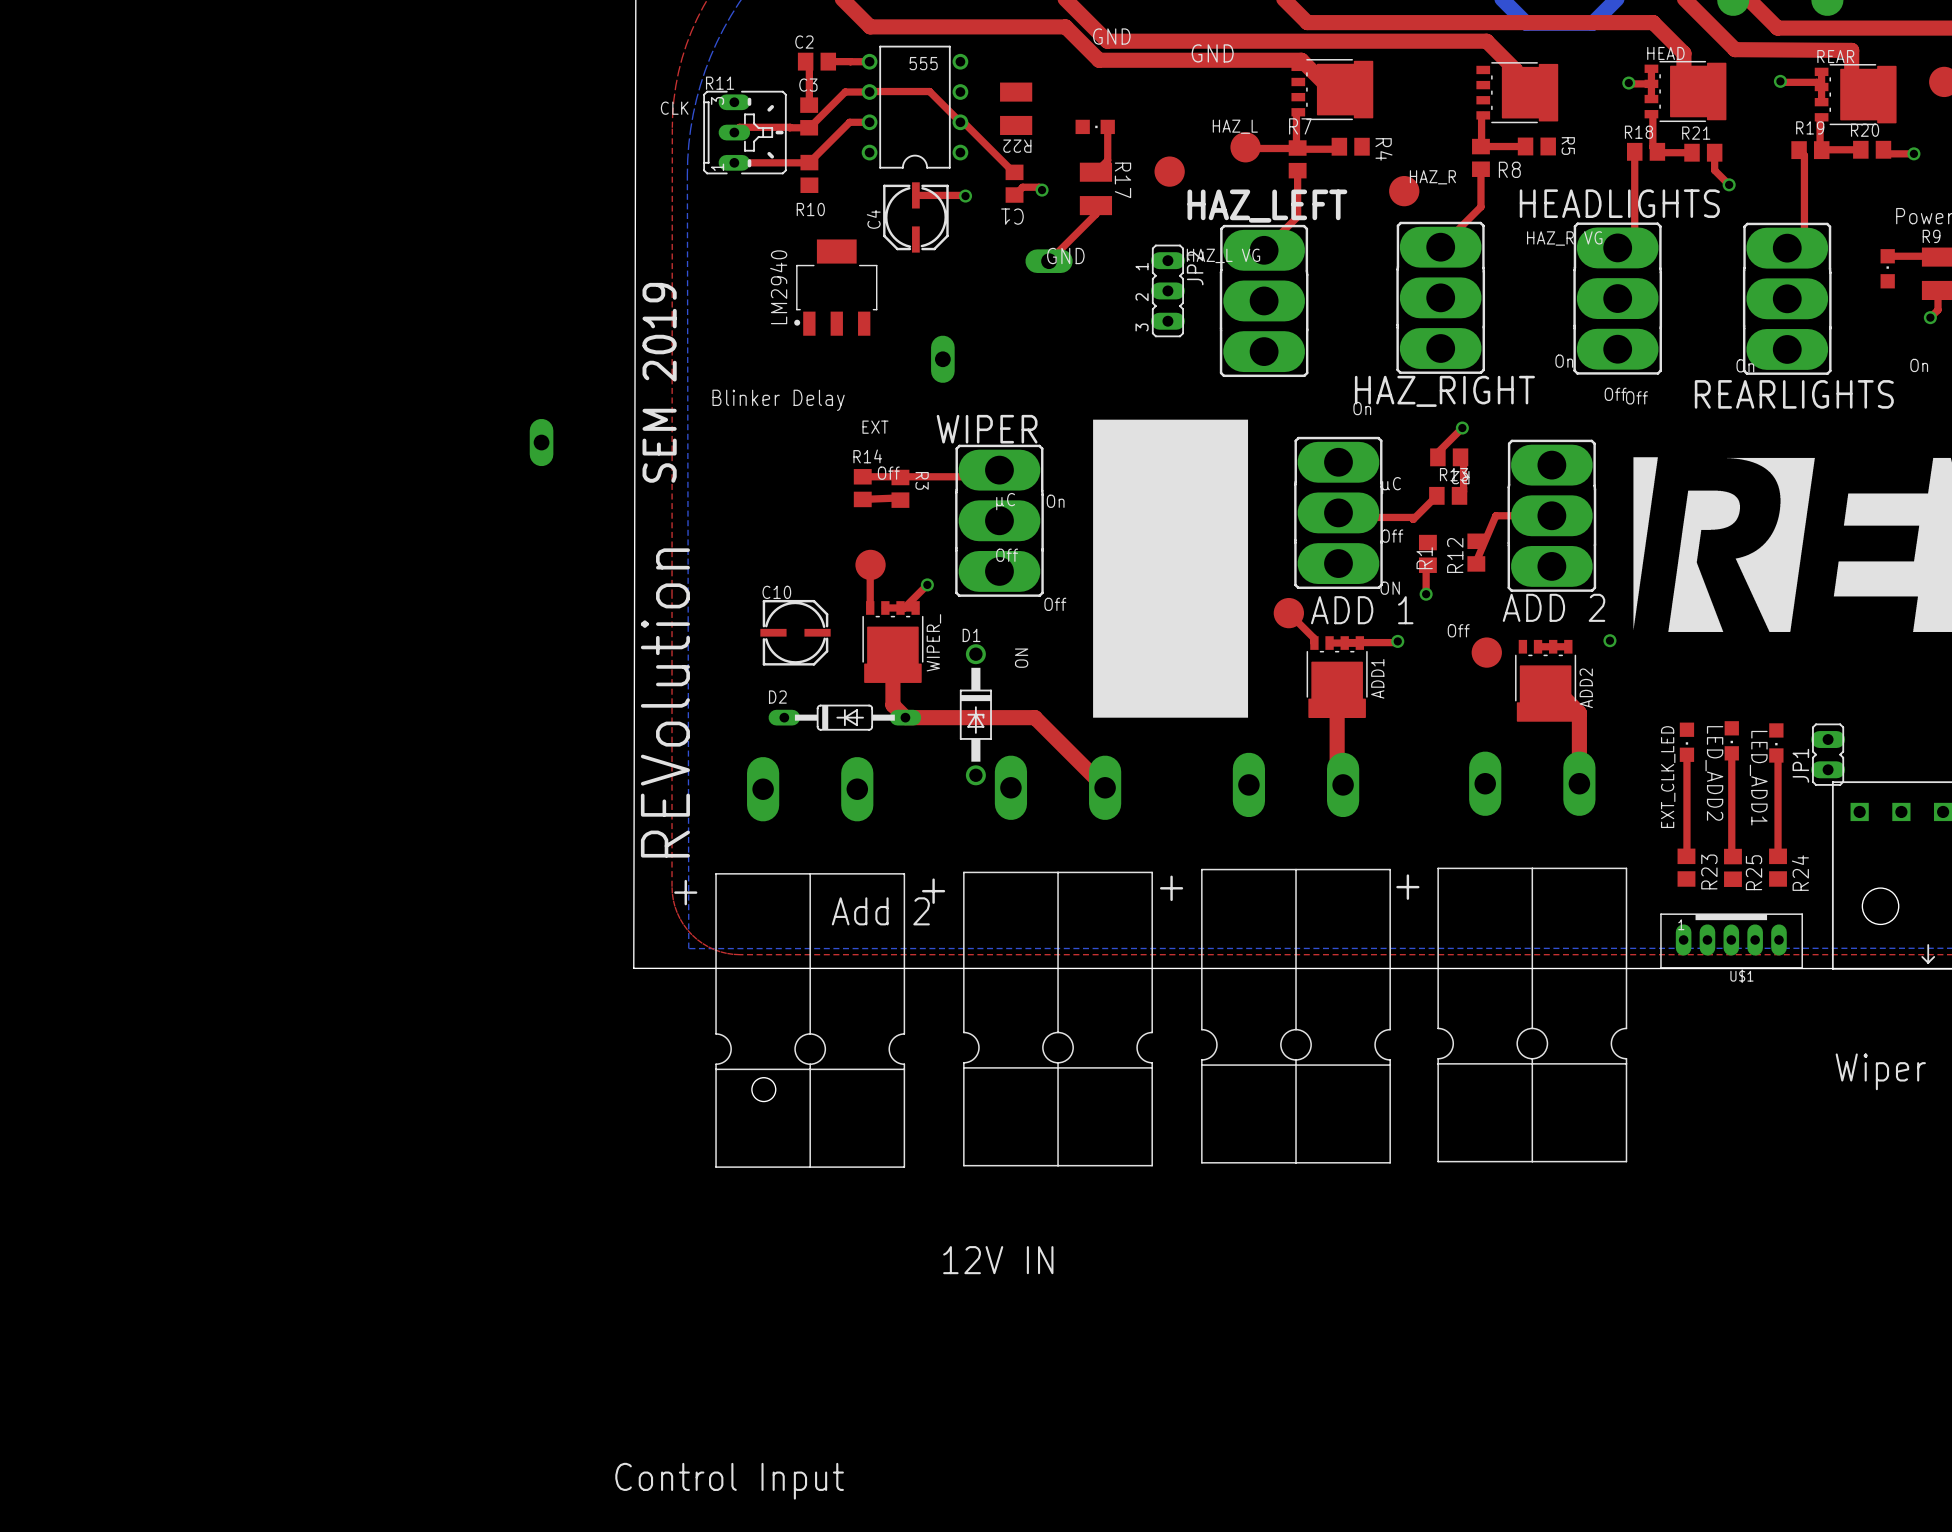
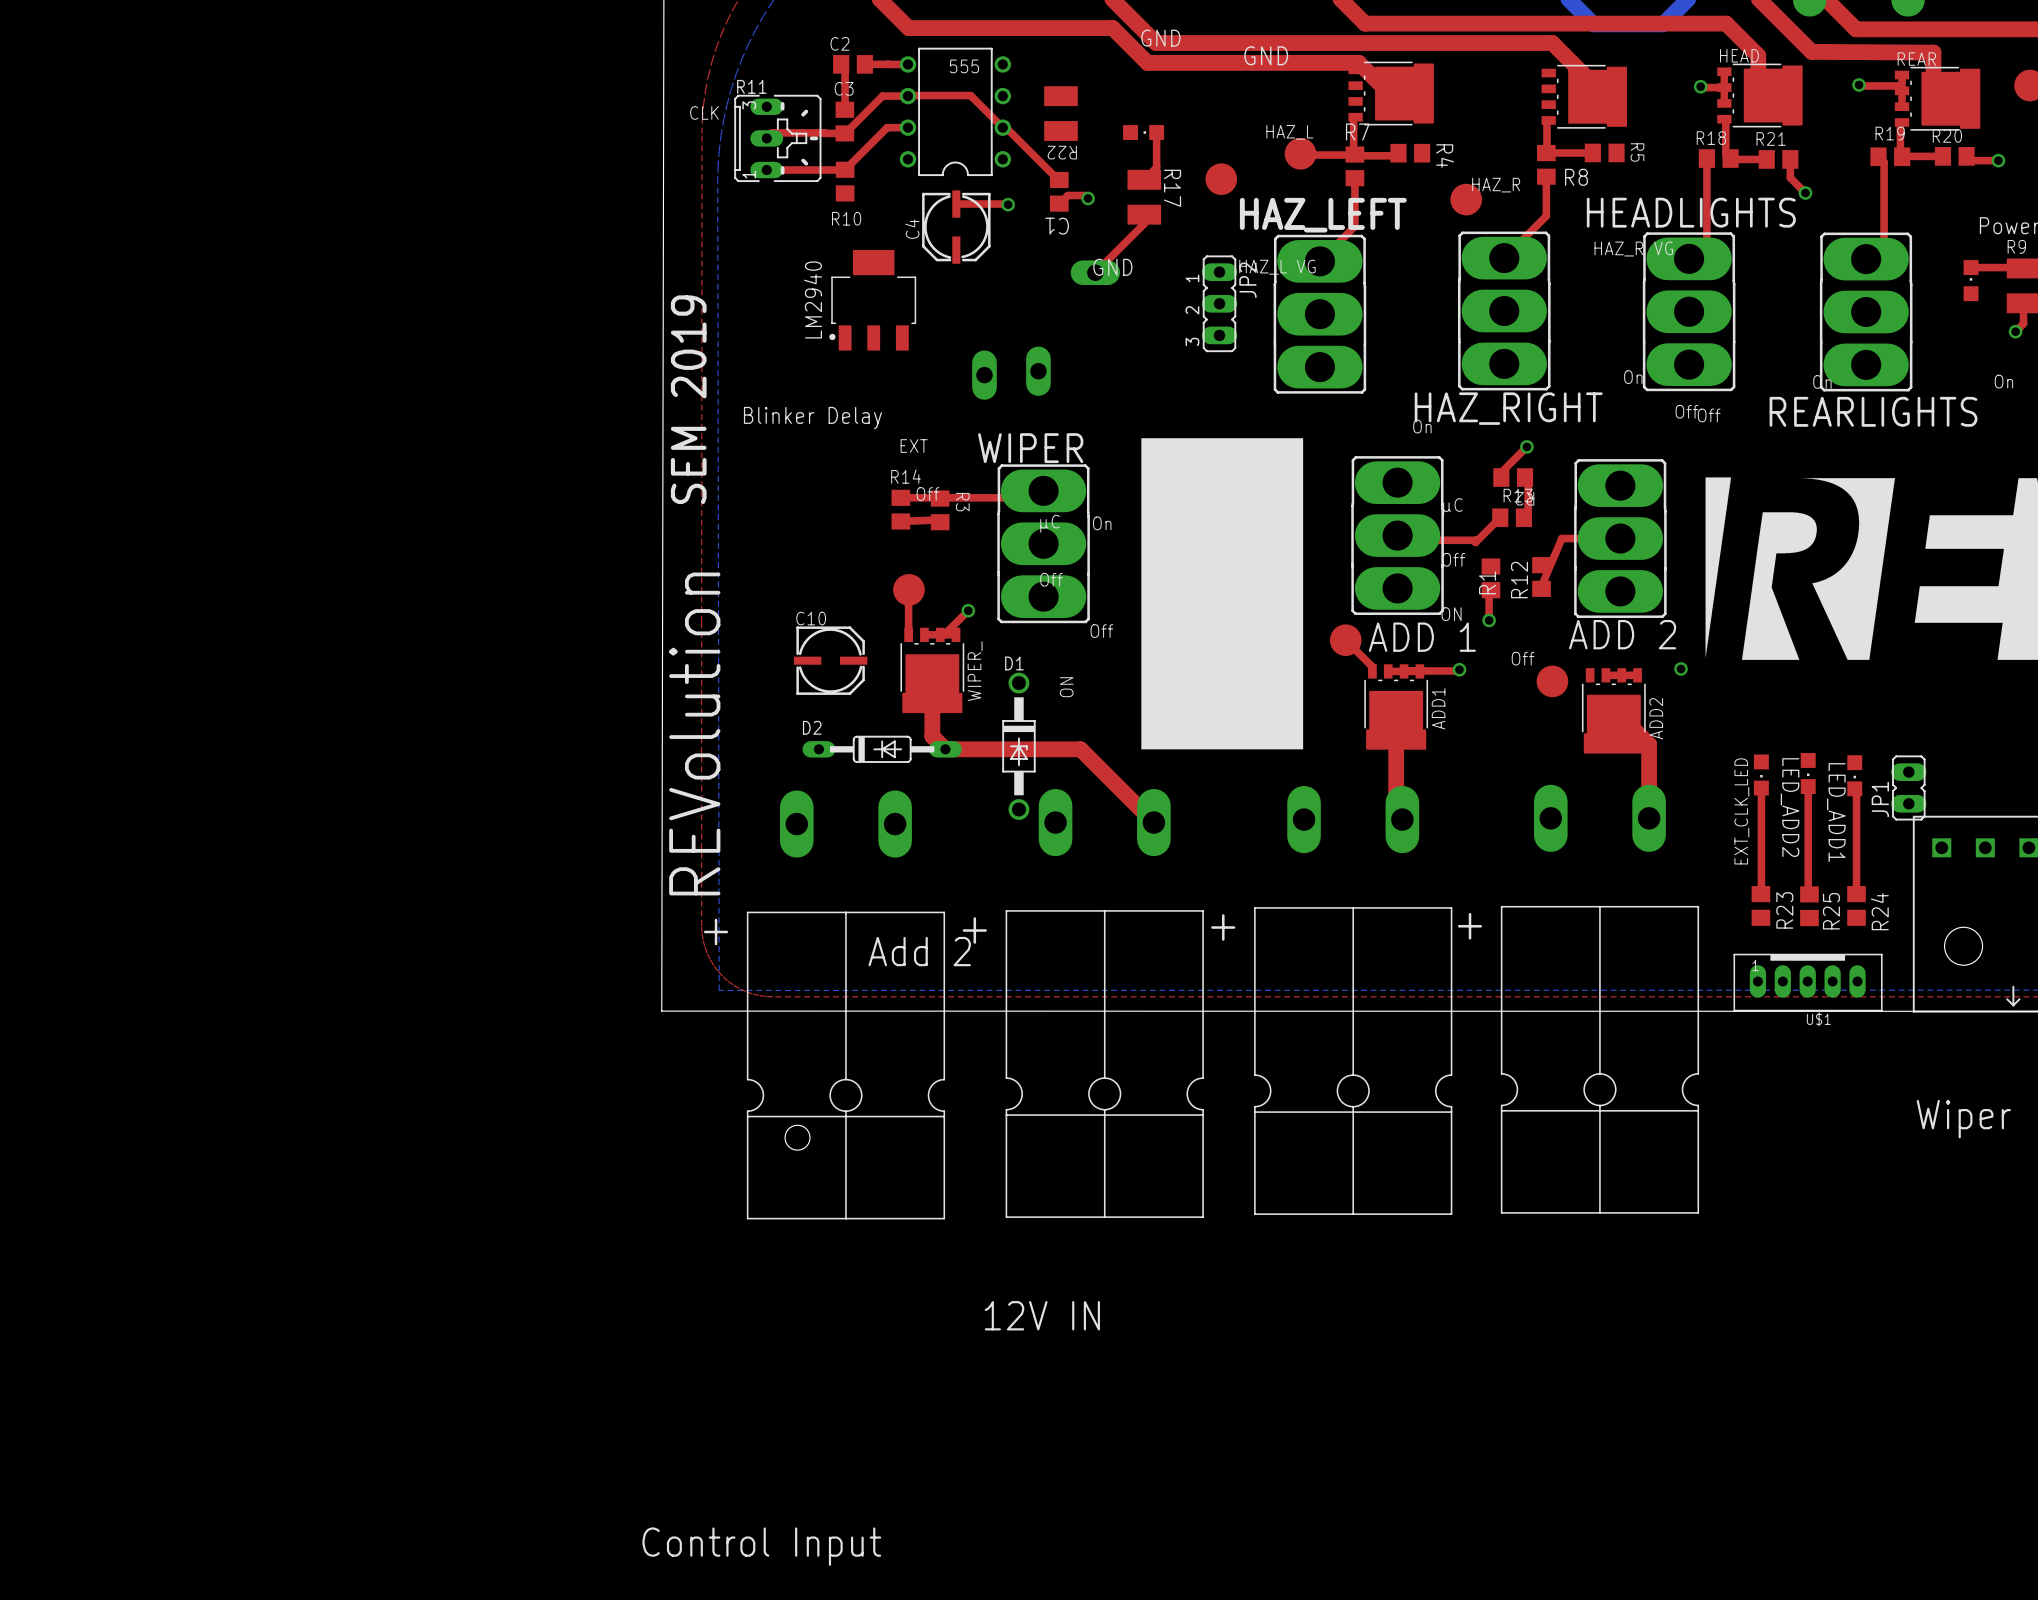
part: none -> (1038, 371)
part: (541, 442) -> none

